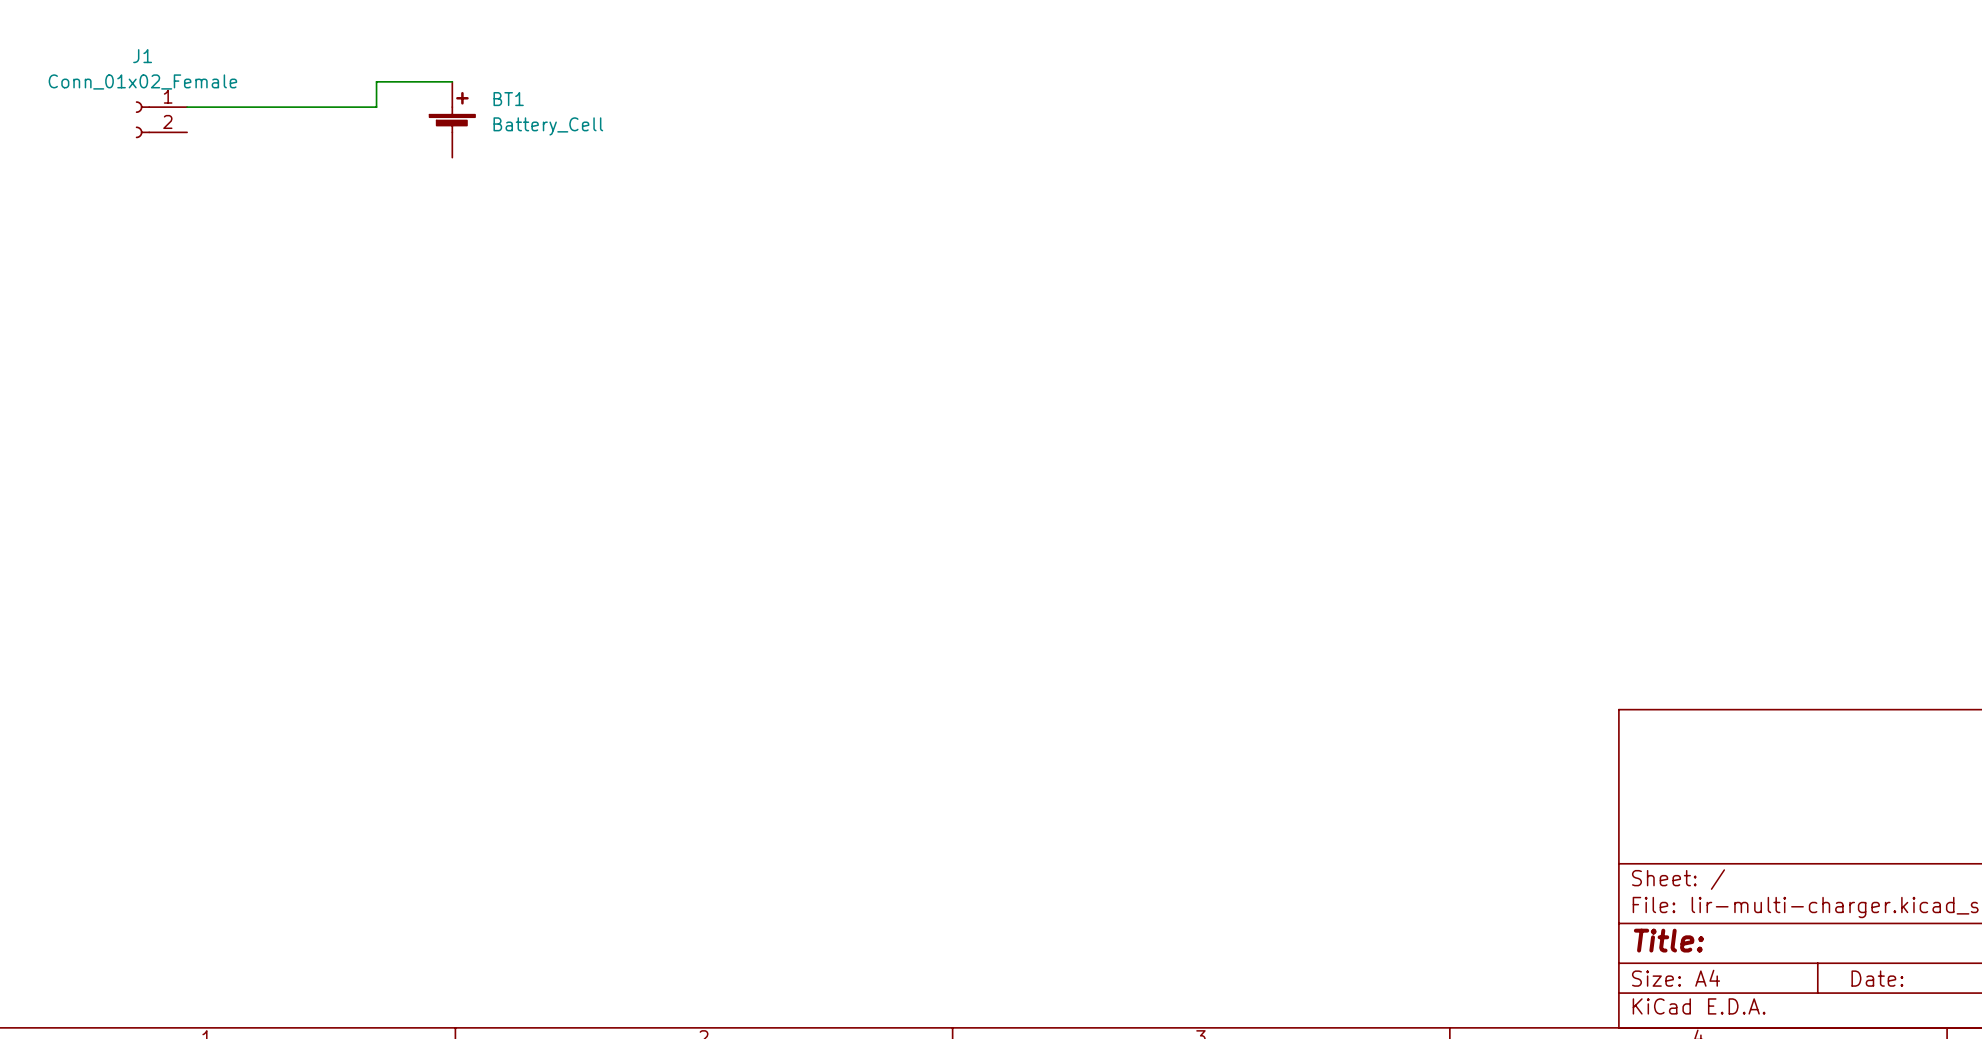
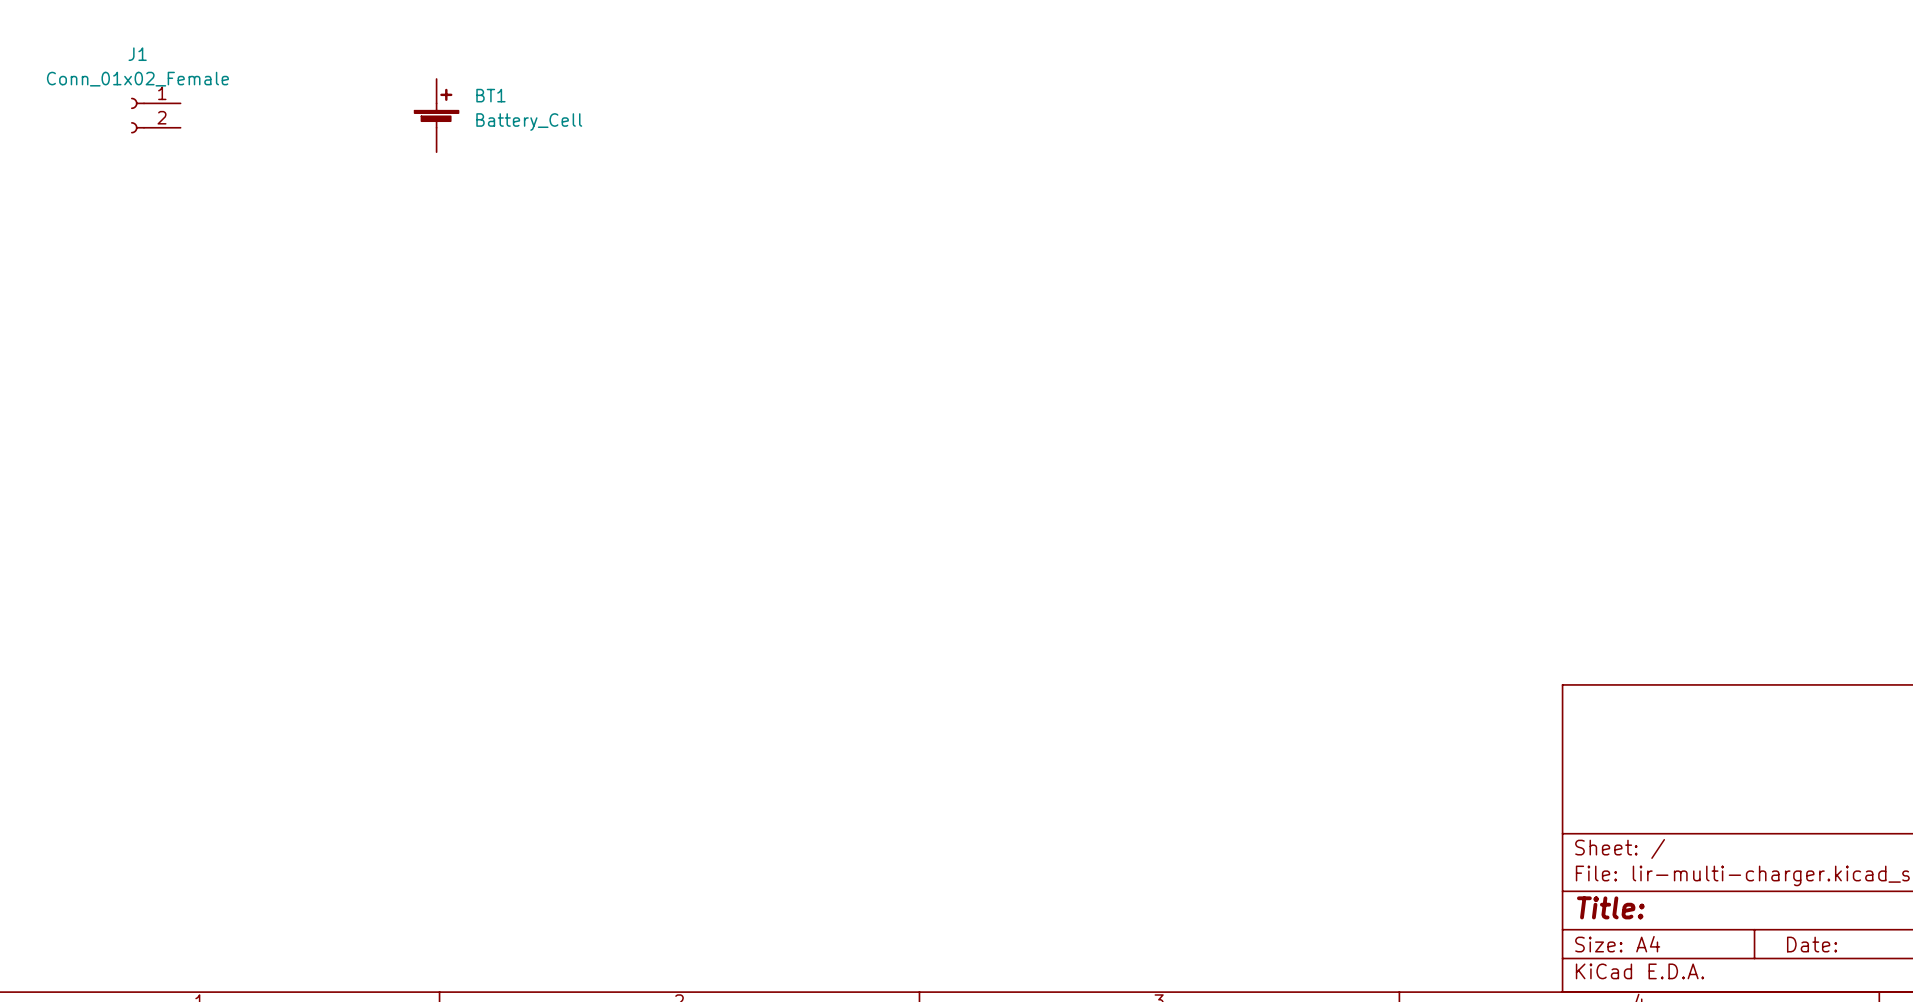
wire: (452, 81) (376, 81) (376, 107) (187, 107) -> none

